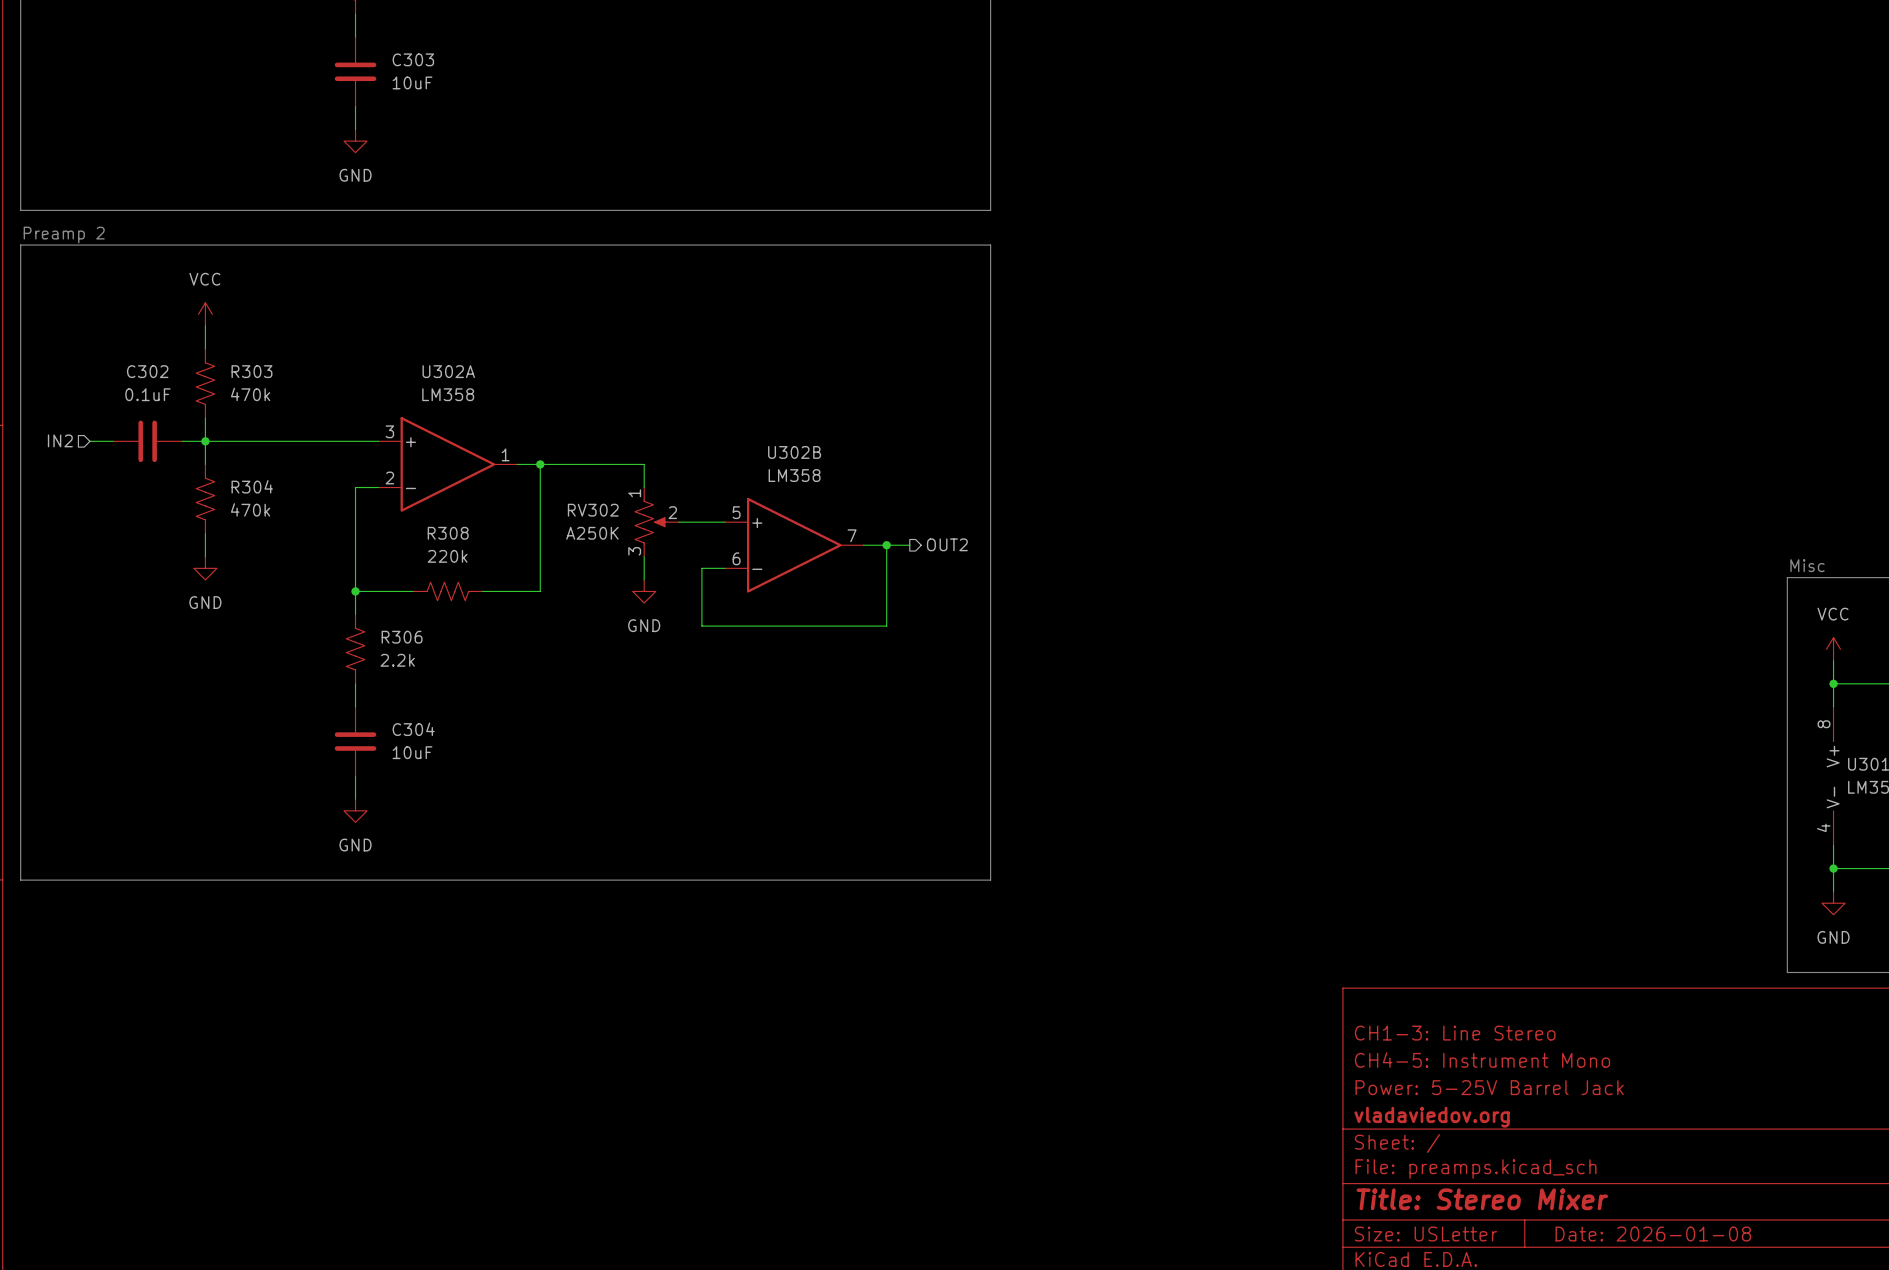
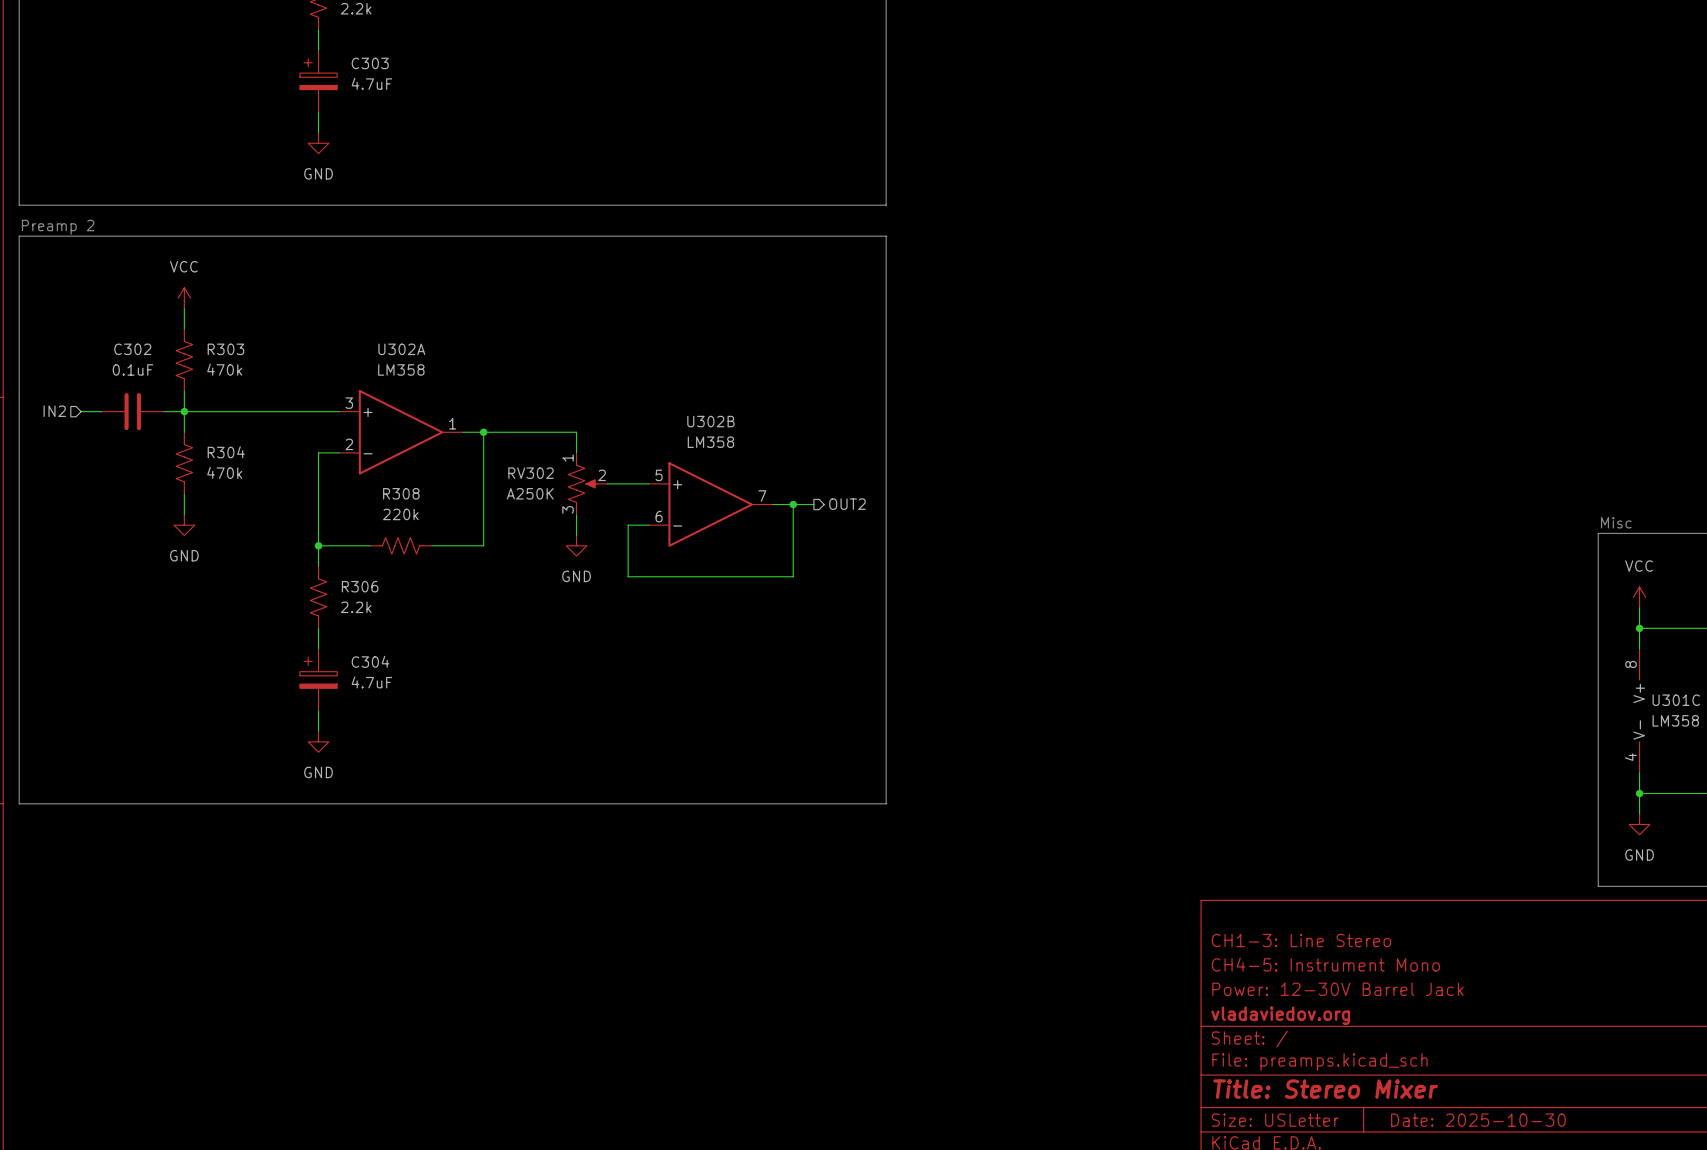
C303 symbol: [334, 37, 377, 107] -> [299, 50, 338, 113]
C303 value: 10uF (412, 82) -> 4.7uF (371, 83)
C304 symbol: [334, 706, 377, 777] -> [299, 649, 338, 711]
C304 value: 10uF (412, 752) -> 4.7uF (371, 682)
title block: Power: 5-25V Barrel Jack (1489, 1087) -> Power: 12-30V Barrel Jack (1337, 989)
title block: Date: 2026-01-08 (1653, 1234) -> Date: 2025-10-30 (1478, 1120)

